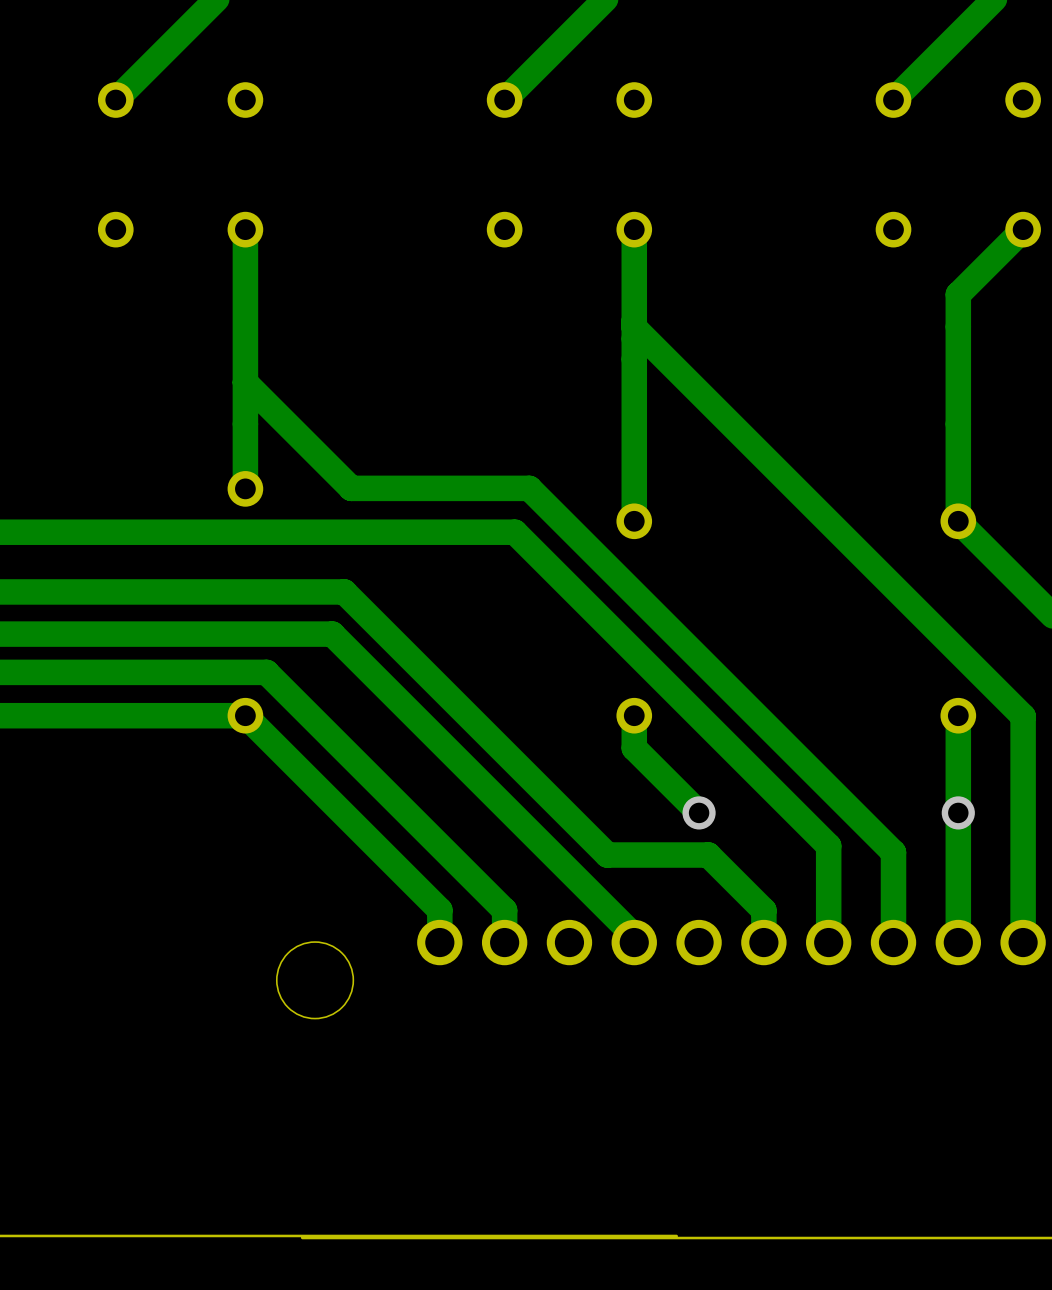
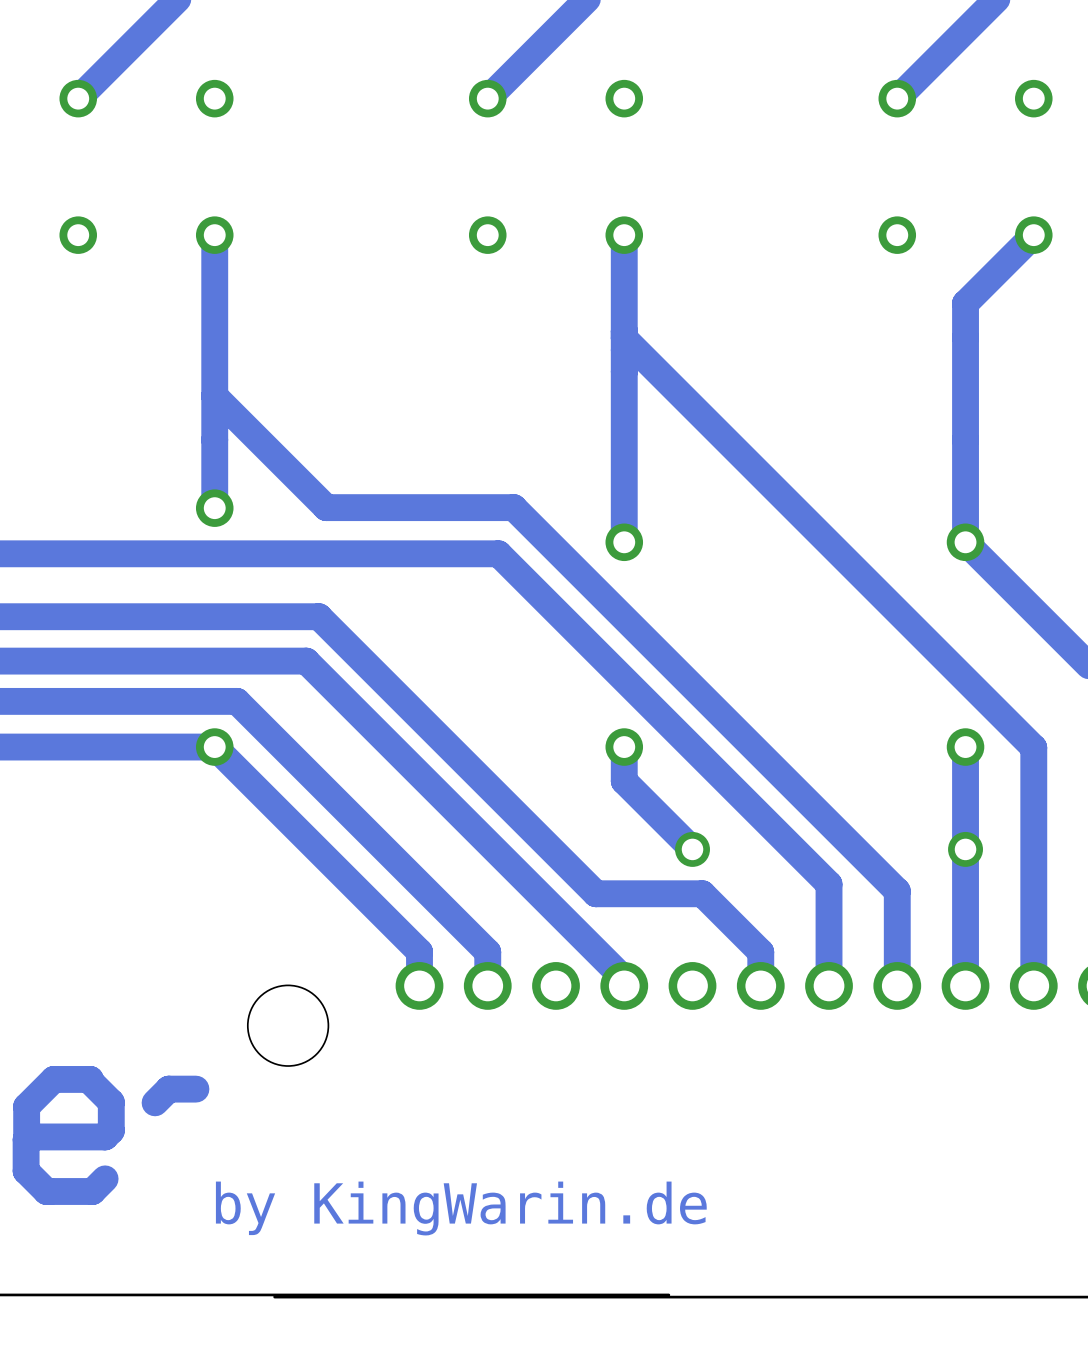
track: none -> (195, 1089) (168, 1089) (155, 1102)
track: none -> (29, 1140) (33, 1136) (105, 1136) (111, 1130) (111, 1102) (90, 1079) (53, 1079) (26, 1106) (26, 1171) (46, 1191) (92, 1191) (105, 1178)
text: none -> by KingWarin.de (461, 1208)

